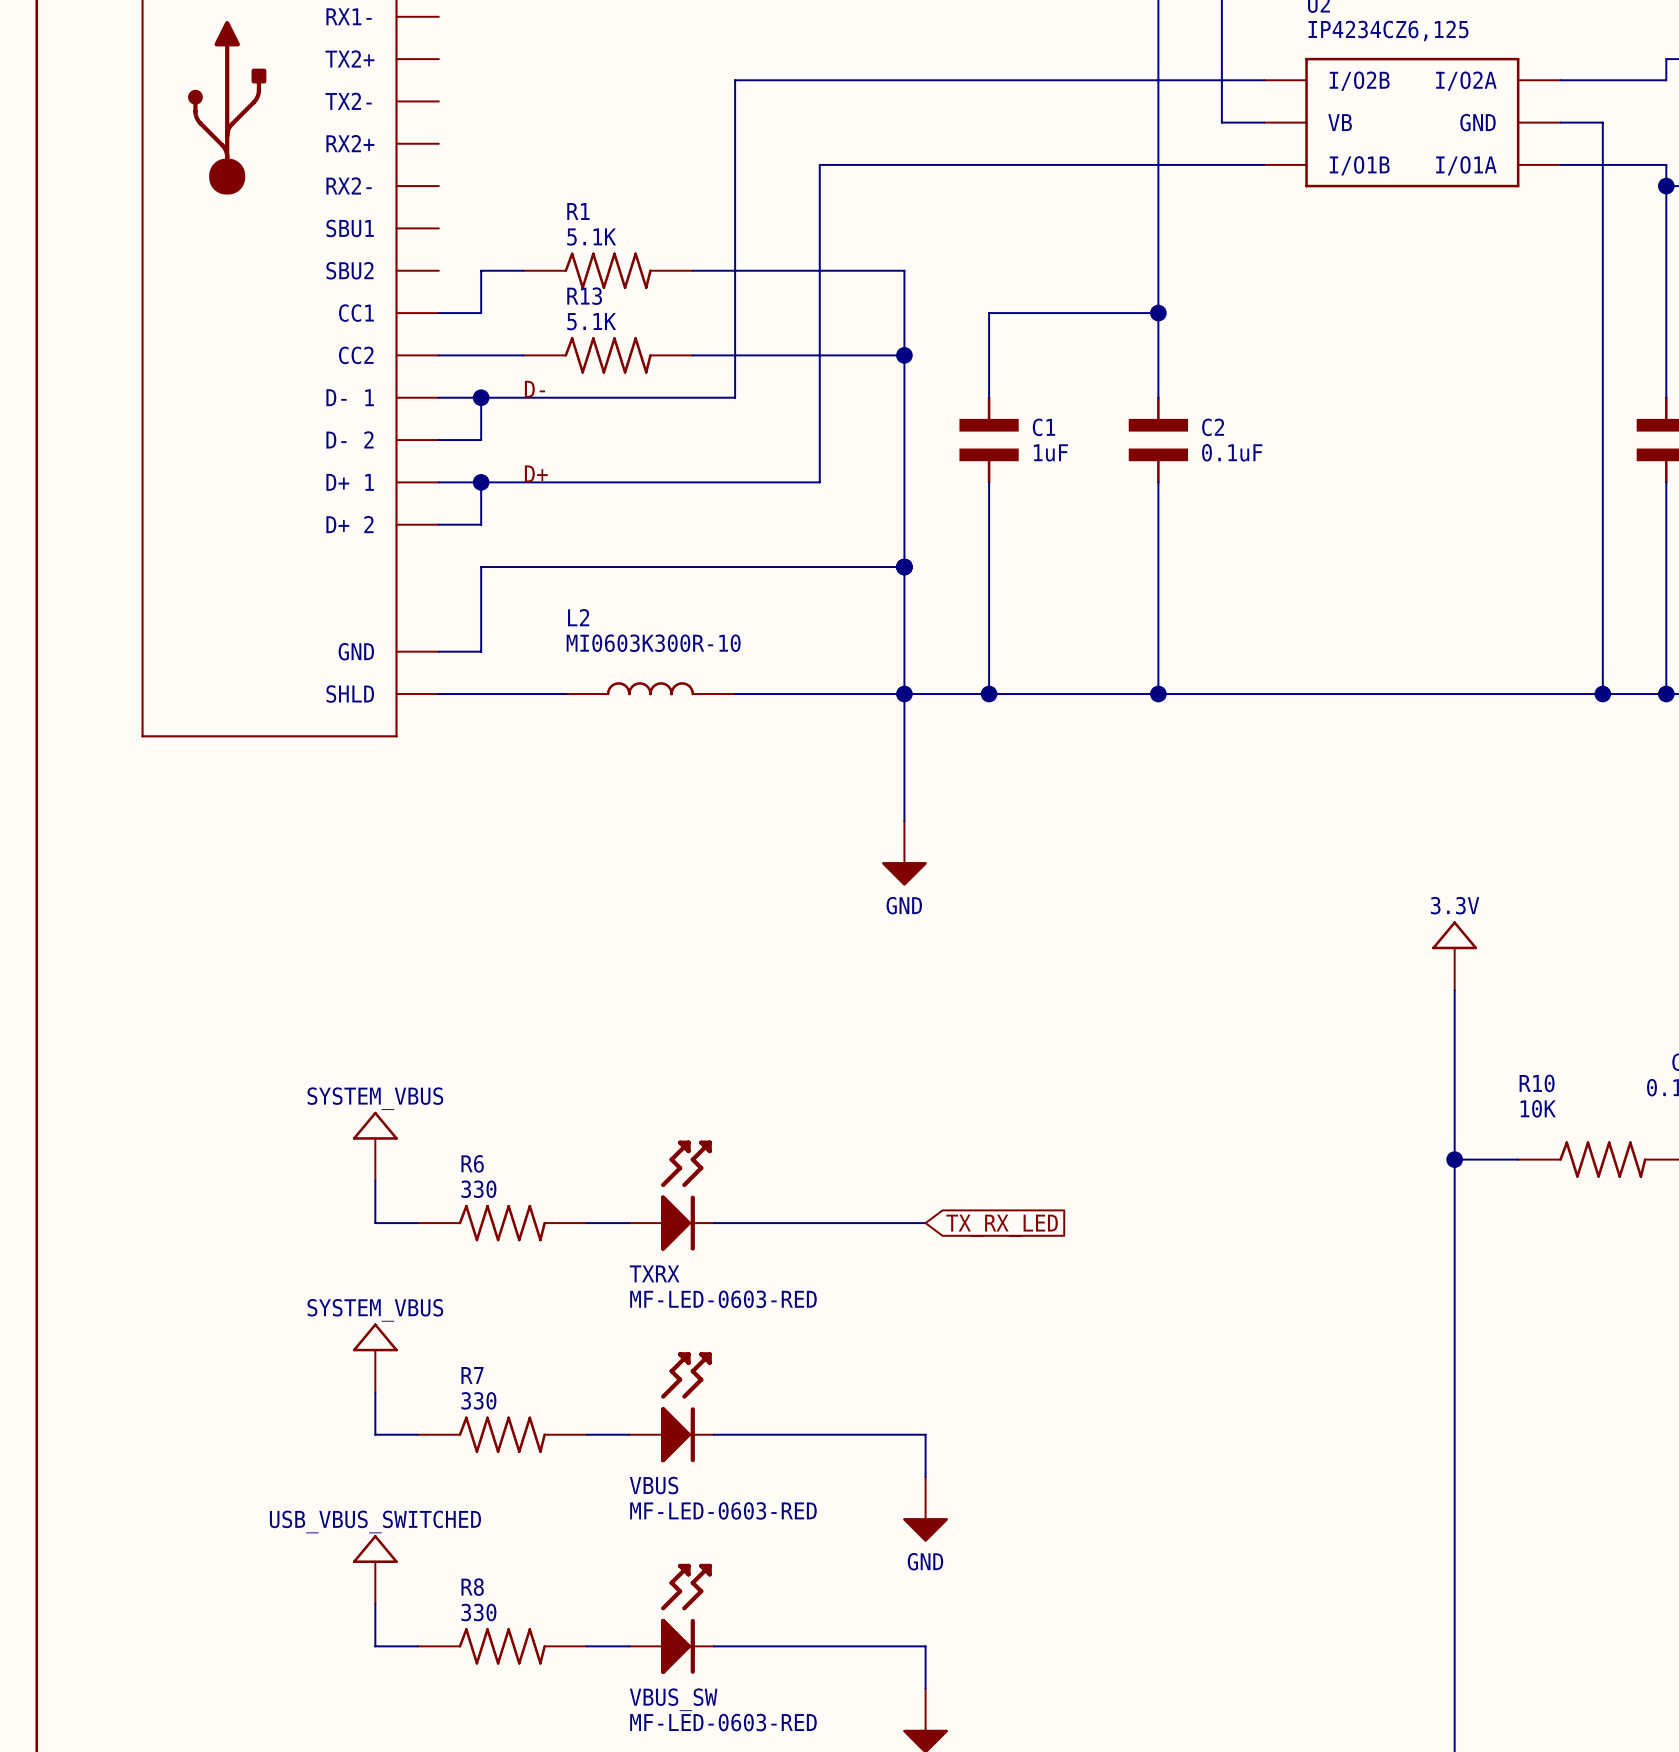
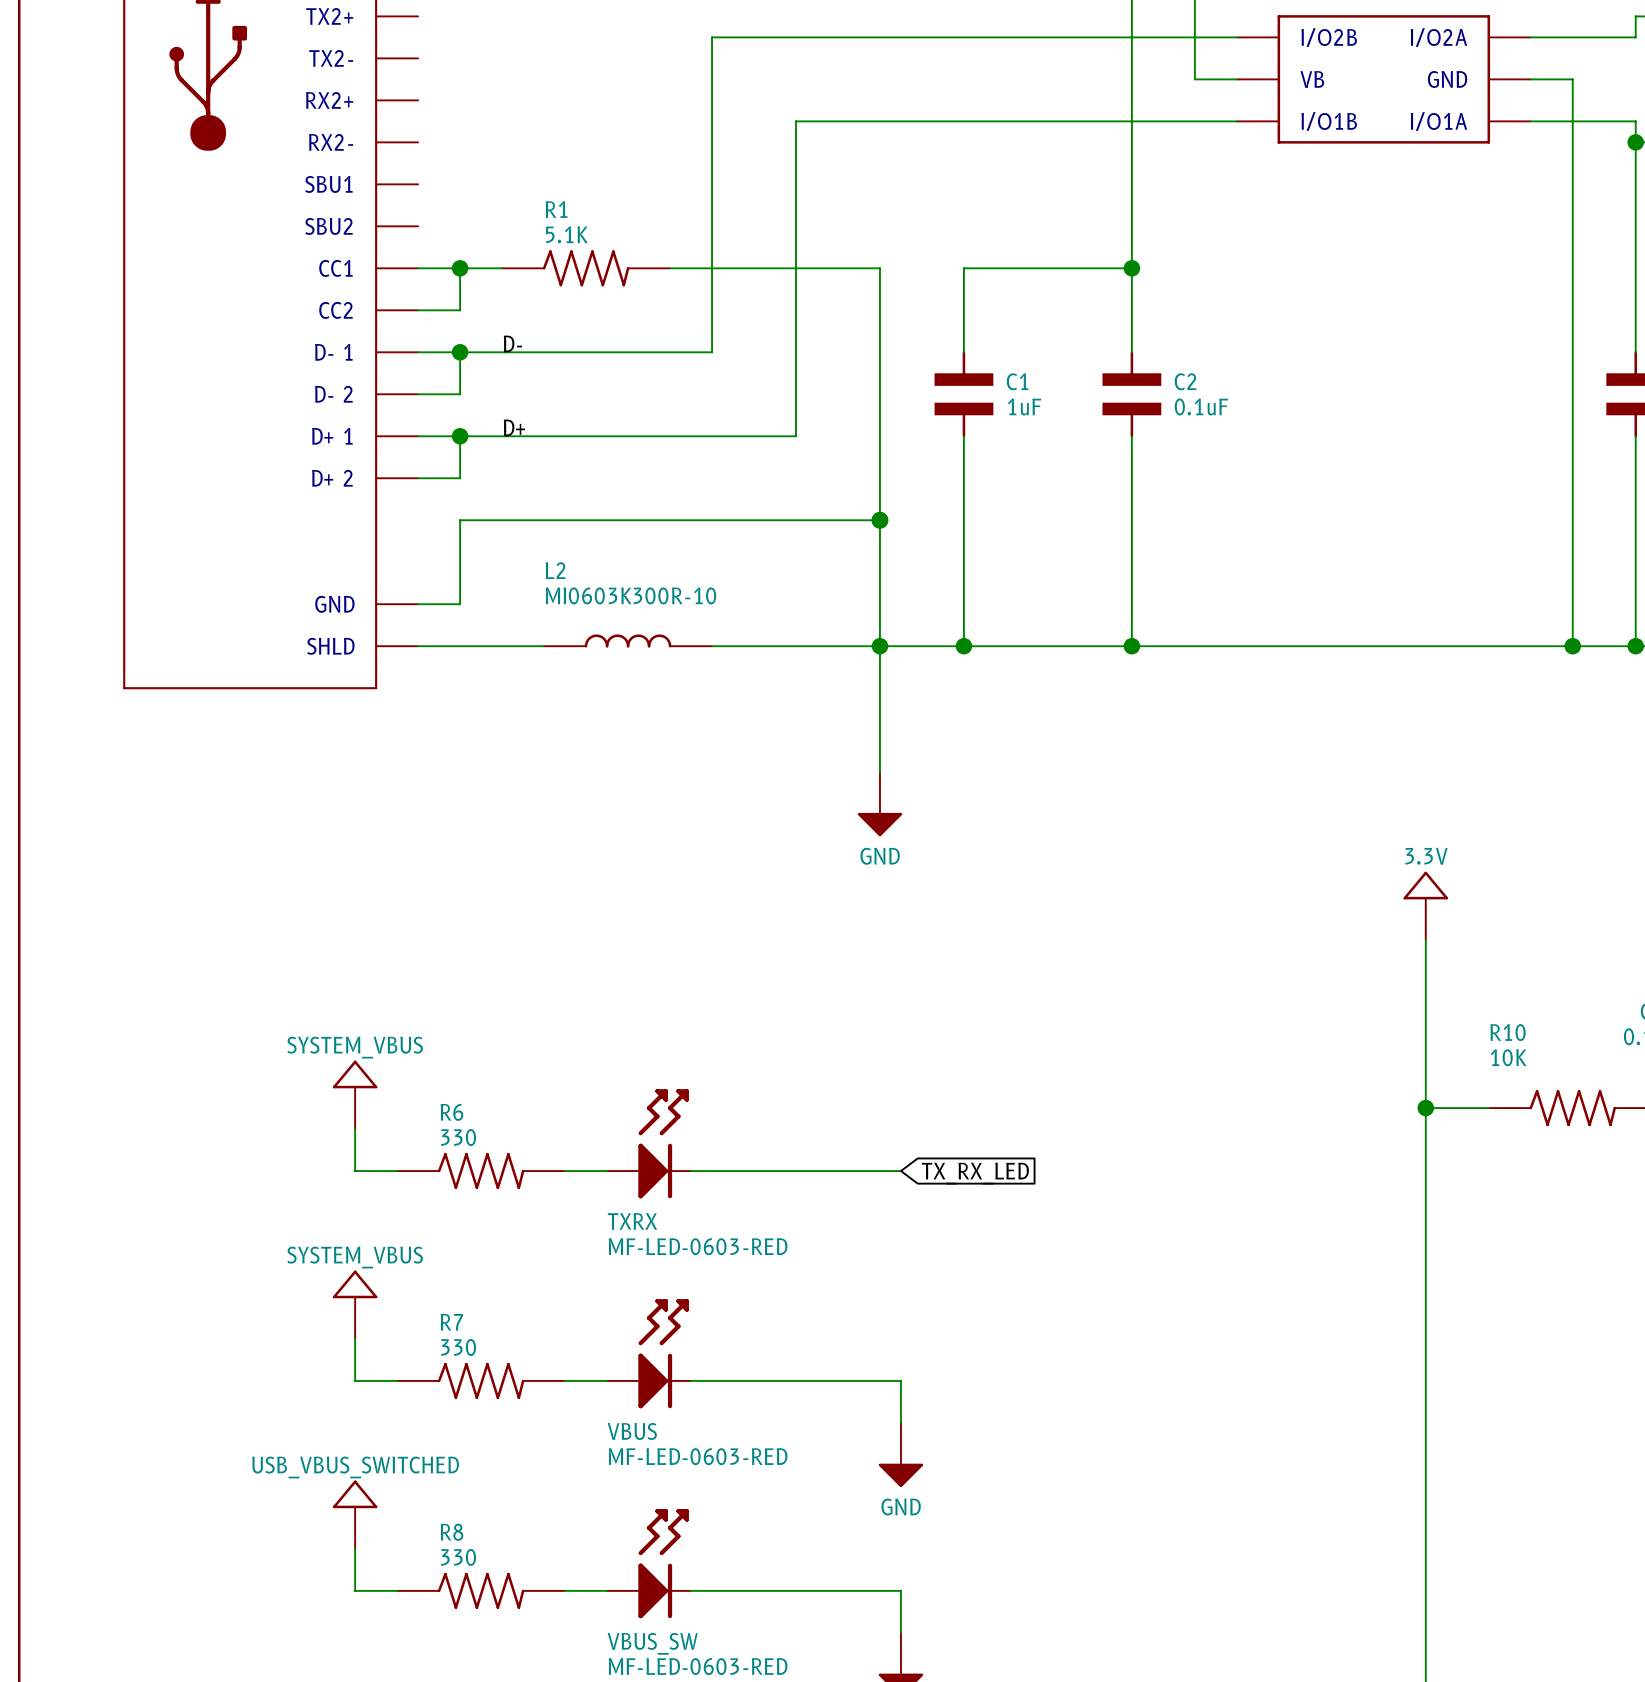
wire: (523, 270) (481, 270) (481, 313) -> none
R1 position: (608, 270) -> (586, 268)
wire: (692, 270) (904, 270) (904, 313) -> (670, 268) (879, 268)
junction: none -> (460, 268)
wire: (481, 355) (523, 355) -> (460, 310) (460, 268) (502, 268)
R13: 5.1K (608, 355) -> none
wire: (692, 355) (904, 355) -> none
junction: (904, 355) -> none

